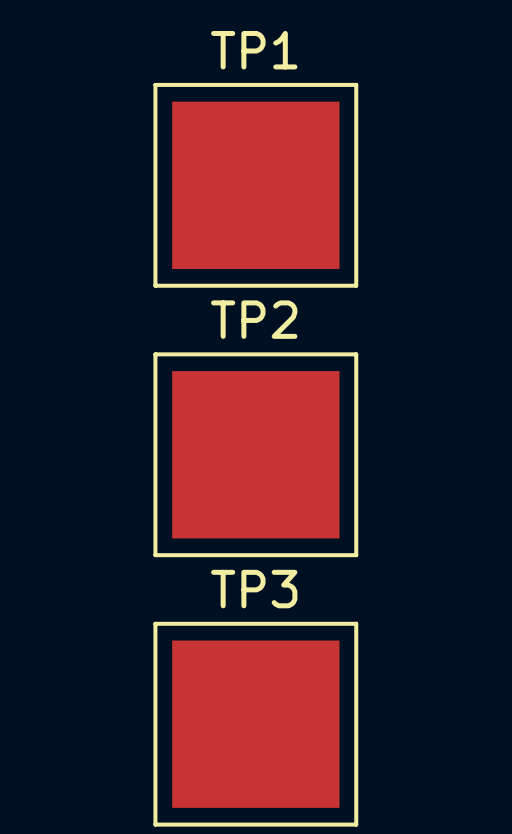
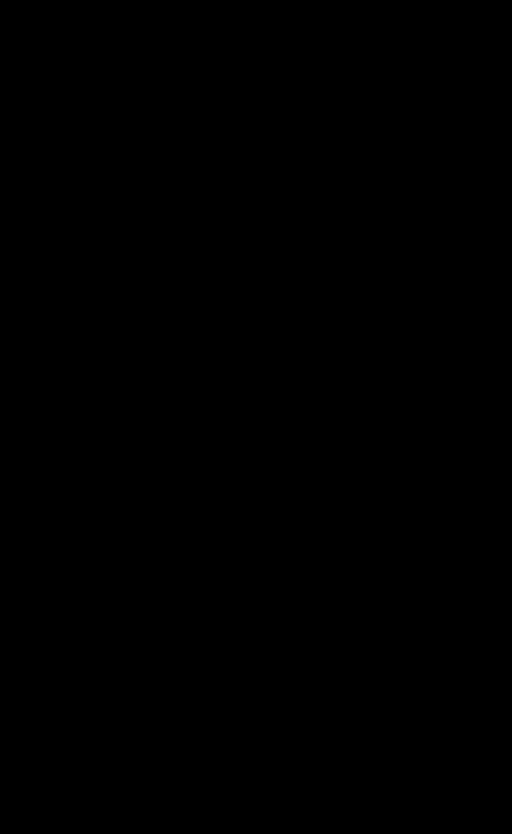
TP1: (255, 185) -> none
TP2: (255, 454) -> none
TP3: (255, 724) -> none

